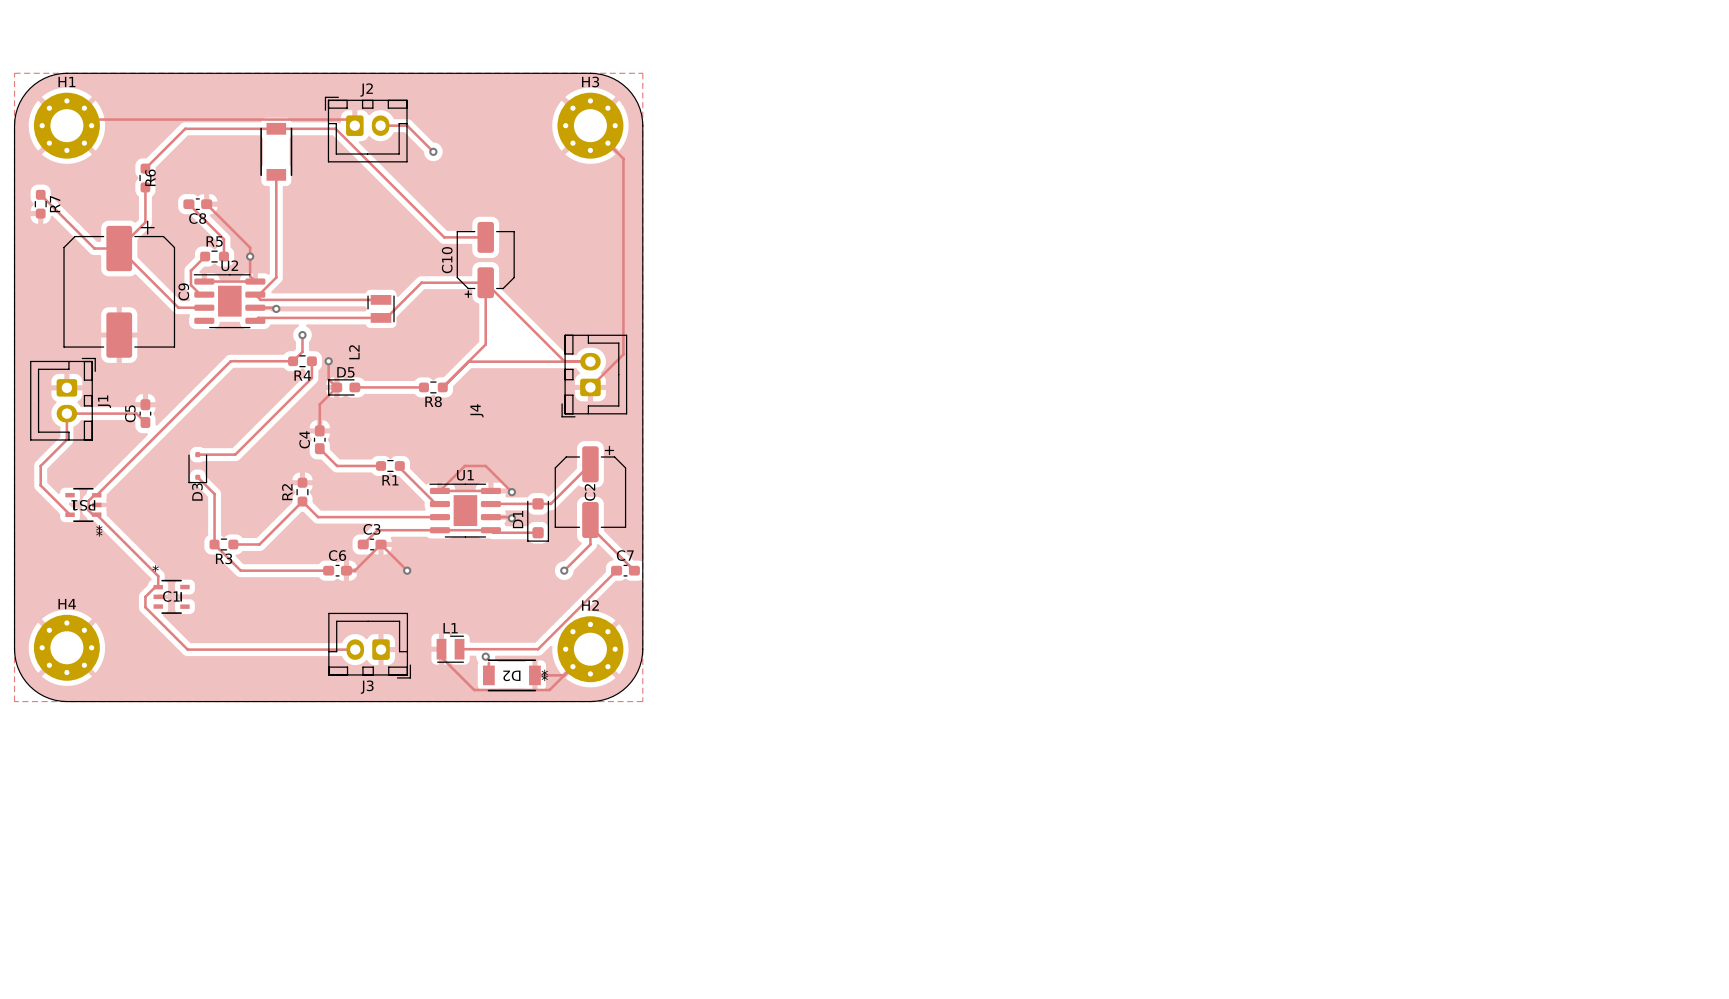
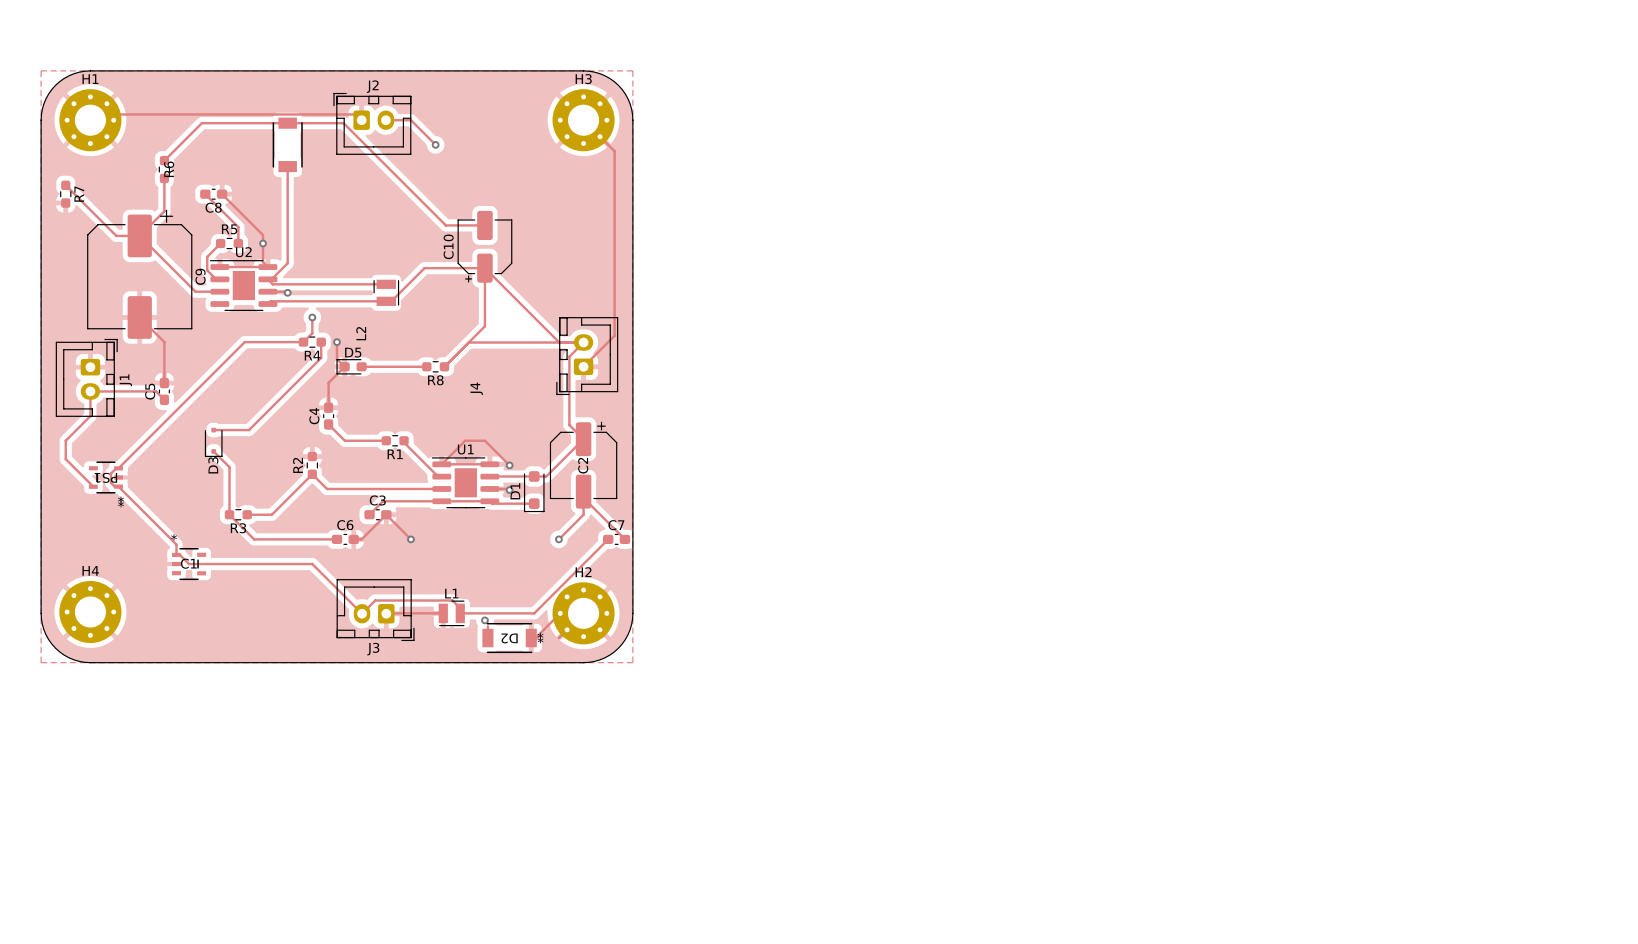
track: none -> (139, 317) (164, 342) (164, 383)
track: none -> (583, 342) (569, 356) (569, 425) (583, 439)
track: (158, 587) (155, 587) (145, 596) (145, 607) (187, 649) (355, 649) -> (176, 554) (179, 554) (189, 564) (312, 564) (362, 613) (375, 600) (452, 600) (460, 608) (460, 613)
track: none -> (443, 613) (386, 613)
track: (441, 657) (474, 690) (549, 690) (564, 675) (539, 675) -> (560, 613) (535, 638)

